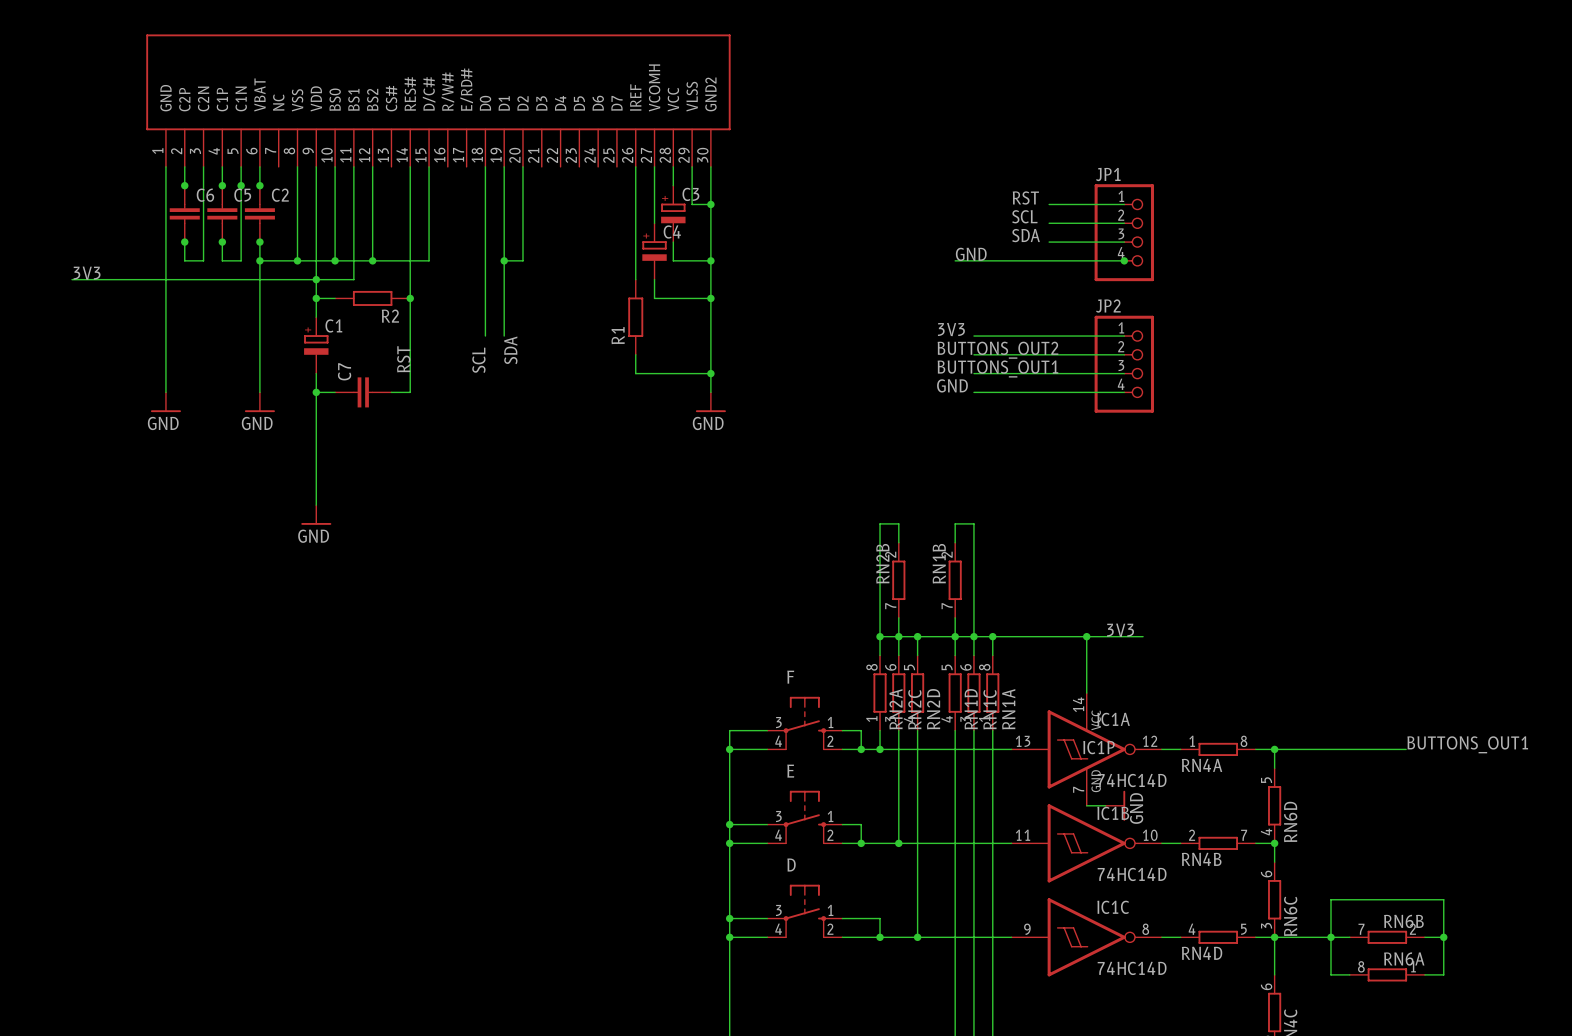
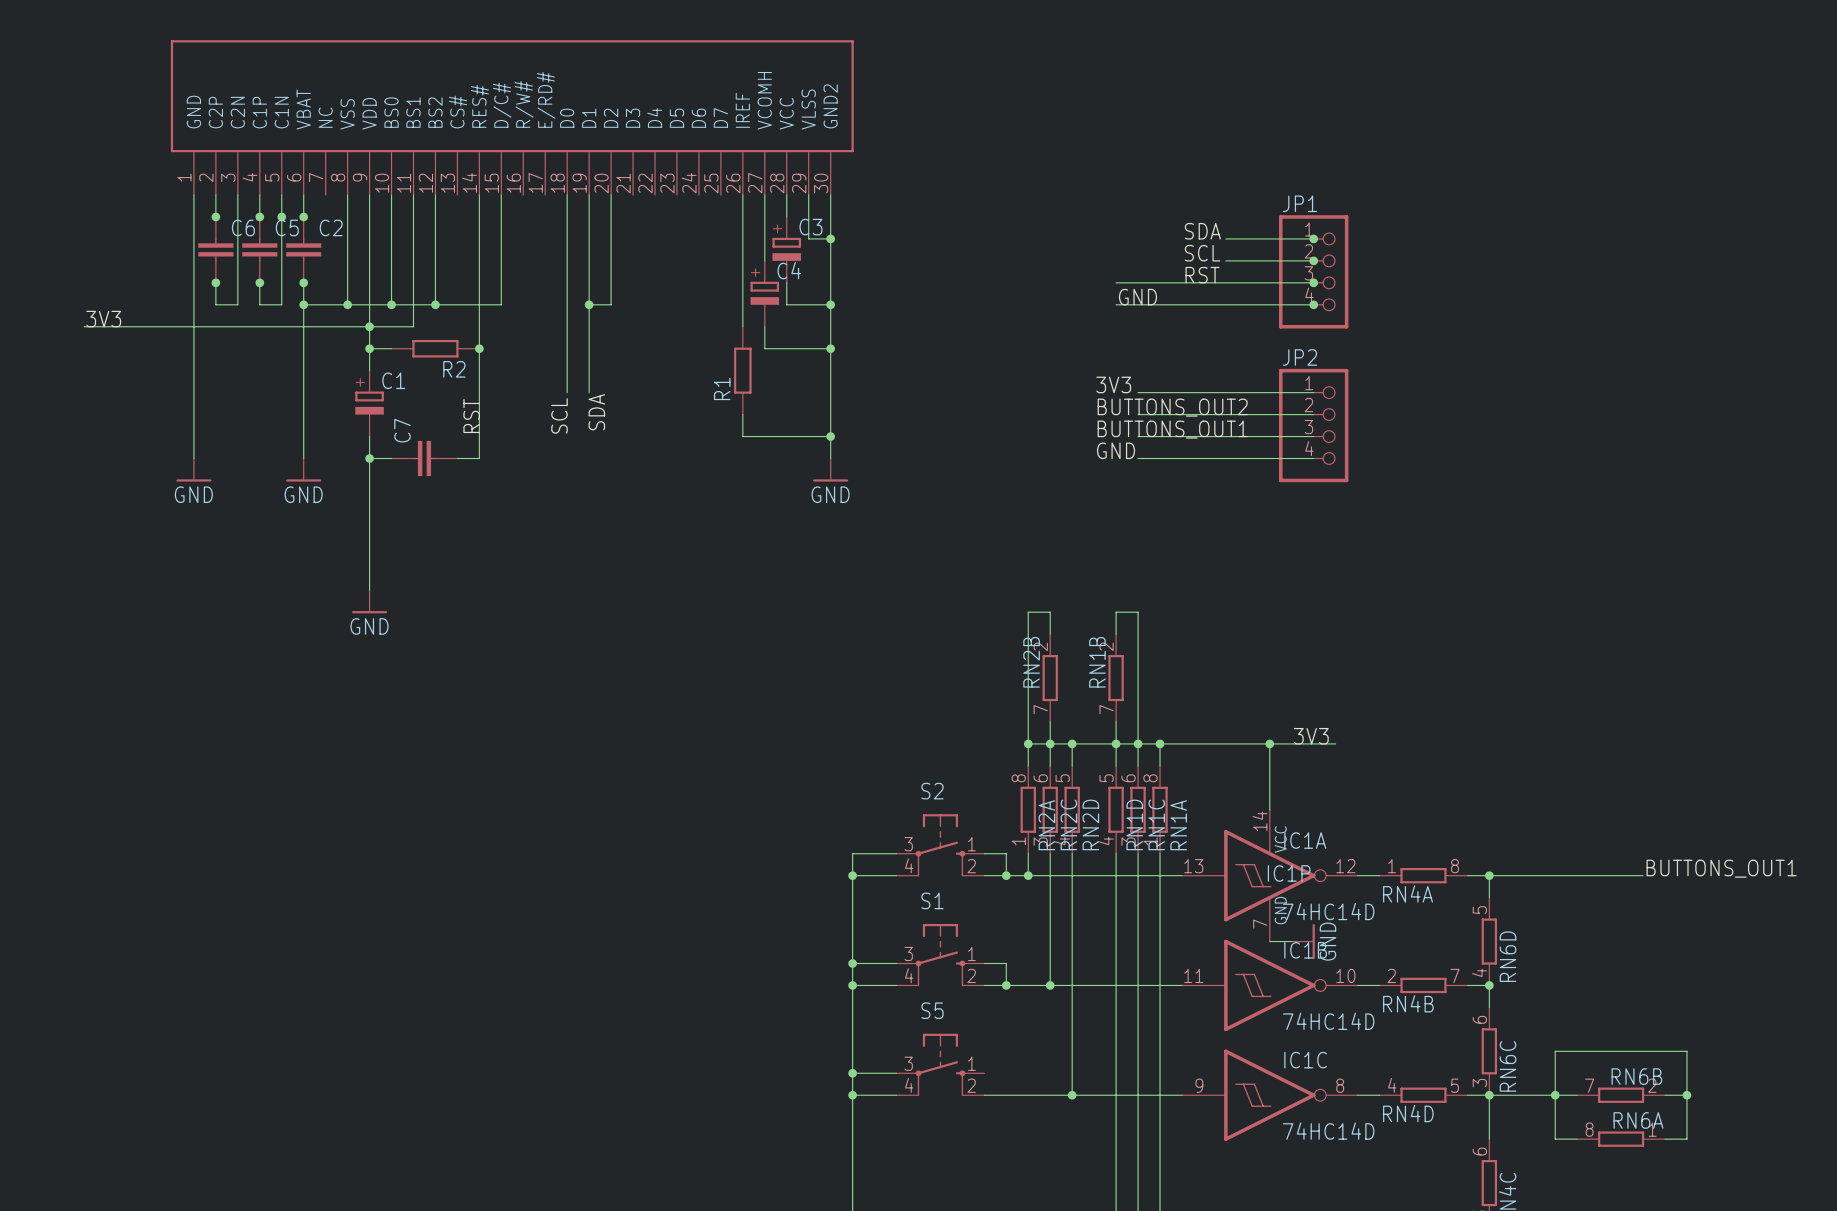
label: RST (1025, 197) -> SDA (1202, 231)
junction: none -> (1313, 238)
junction: none -> (1313, 260)
label: SDA (1026, 235) -> RST (1202, 275)
wire: none -> (1116, 282) (1225, 282)
junction: none -> (1313, 282)
F name: F (790, 677) -> S2 (932, 791)
E name: E (790, 771) -> S1 (932, 900)
D name: D (791, 865) -> S5 (932, 1010)
wire: (842, 918) (880, 918) (880, 937) -> none
junction: (880, 937) -> none

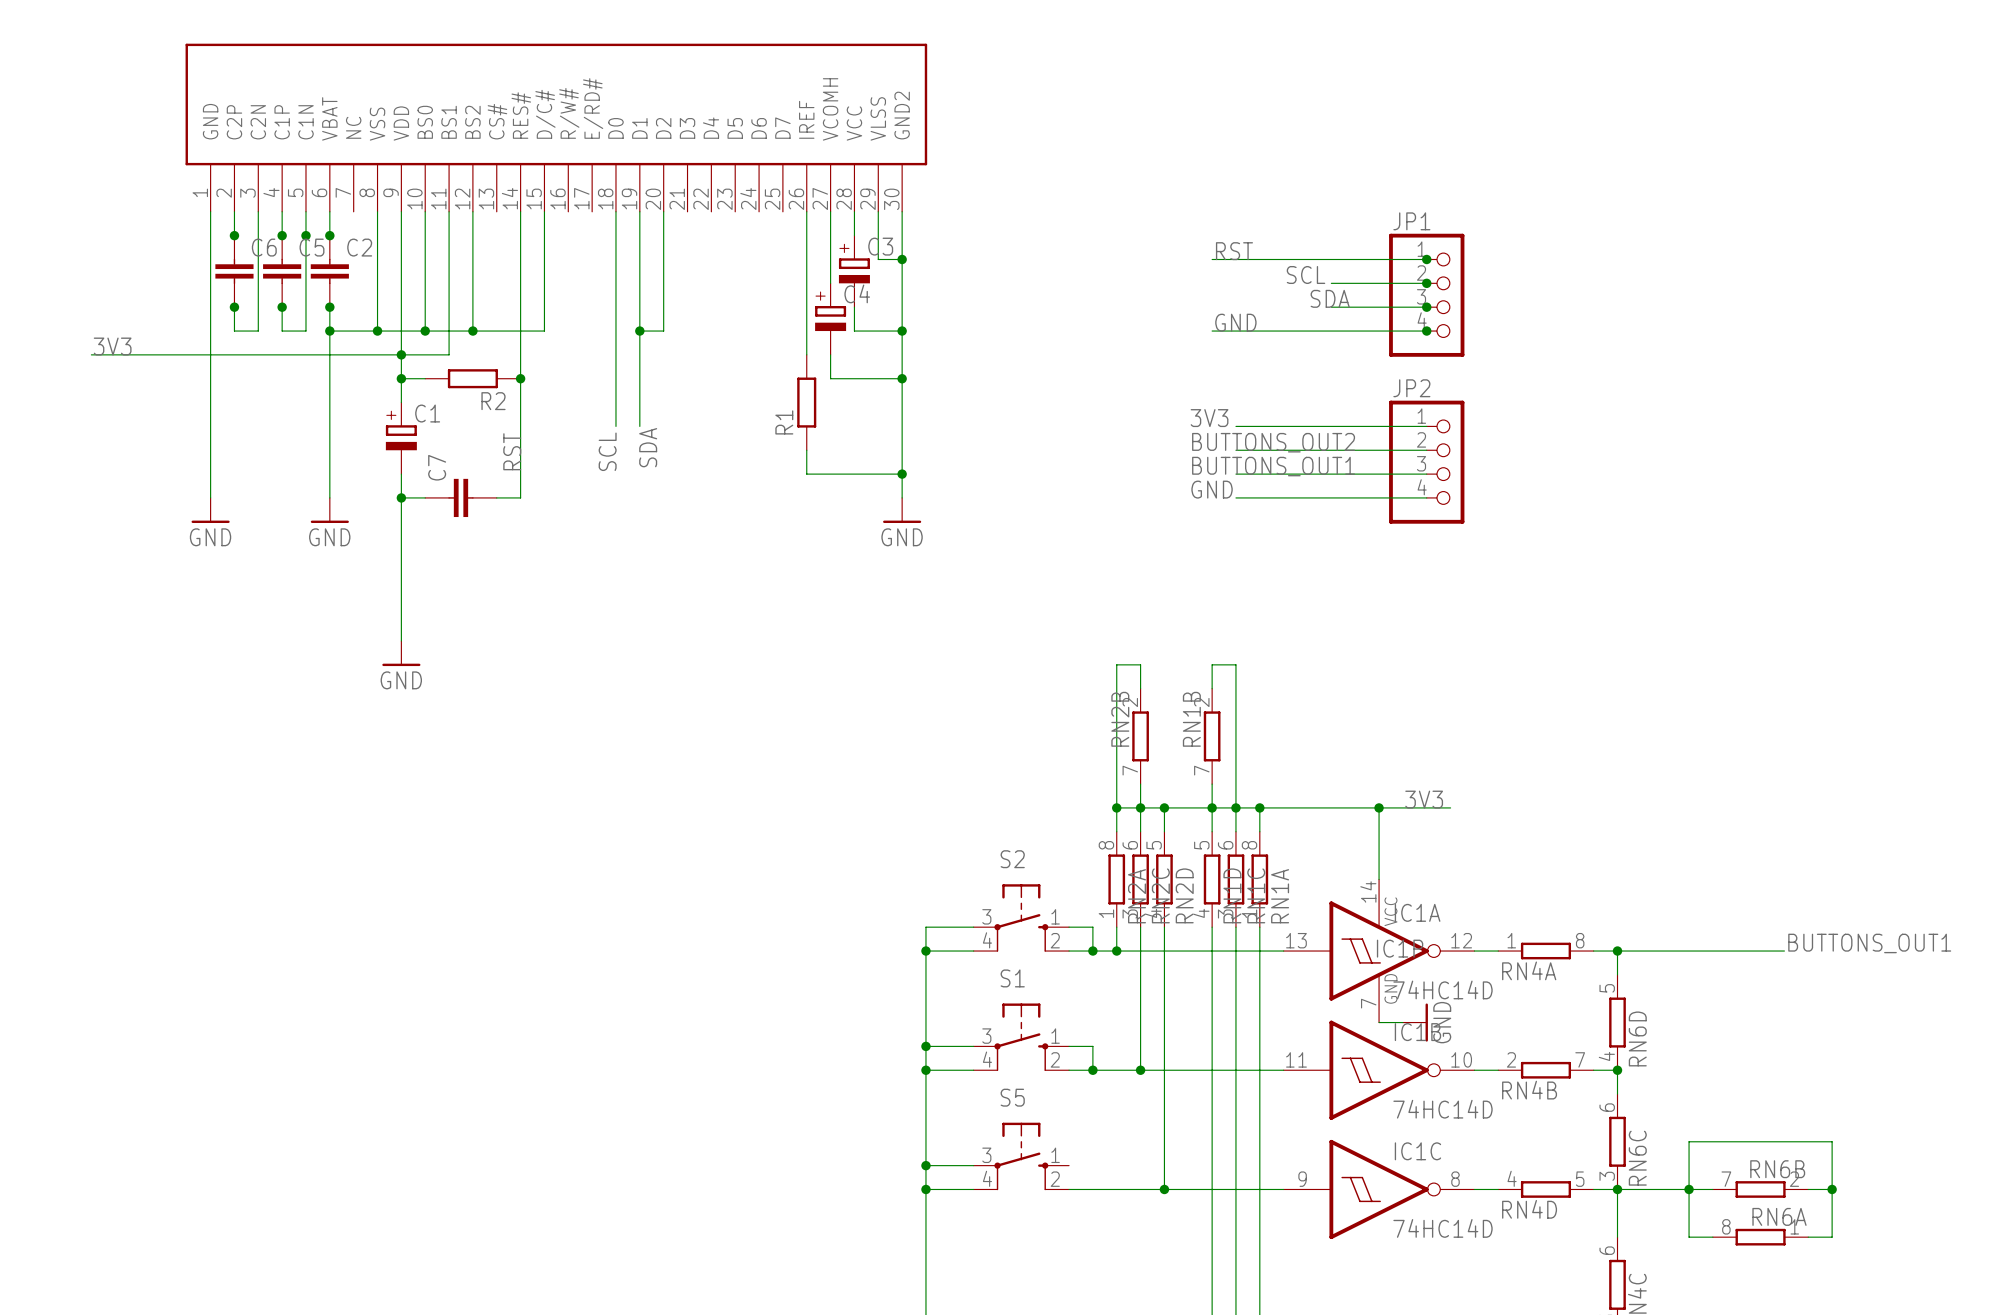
label position: SDA (1202, 231) -> SDA (1330, 298)
label position: RST (1202, 275) -> RST (1234, 251)
wire: (1116, 282) (1225, 282) -> (1212, 259) (1331, 259)

